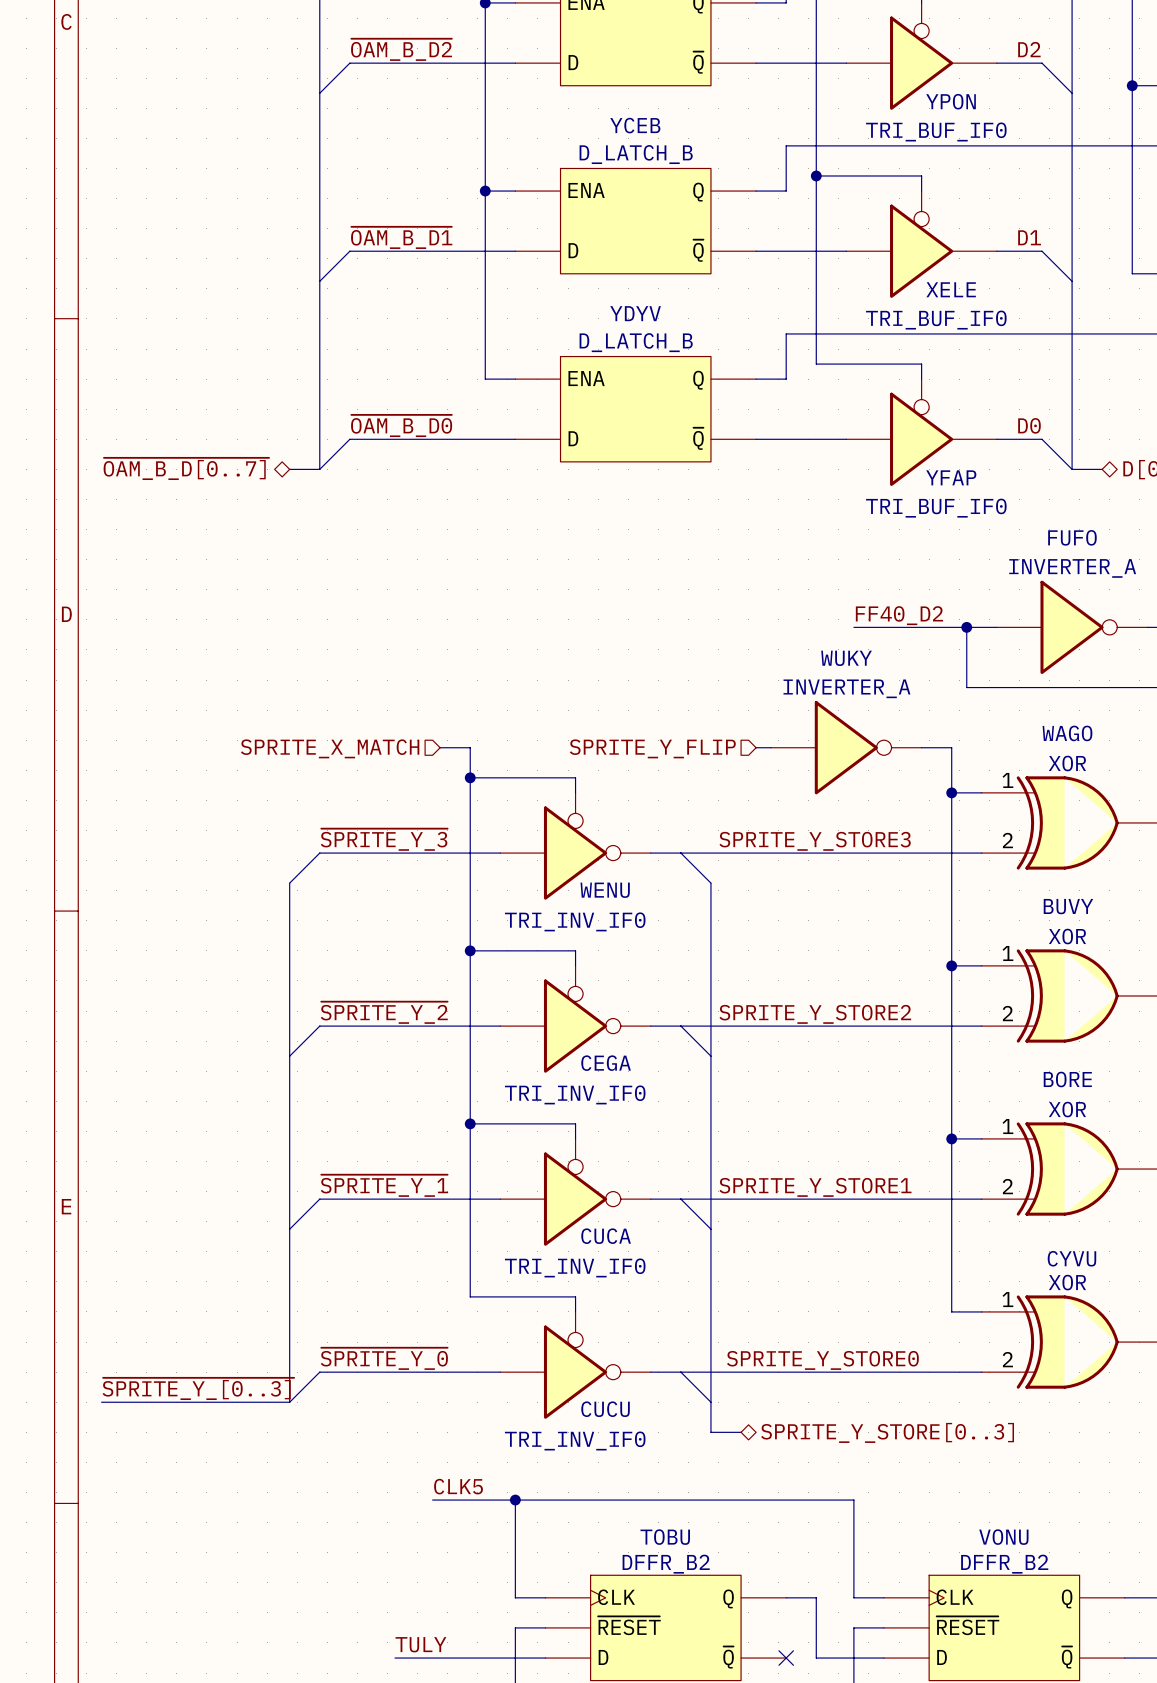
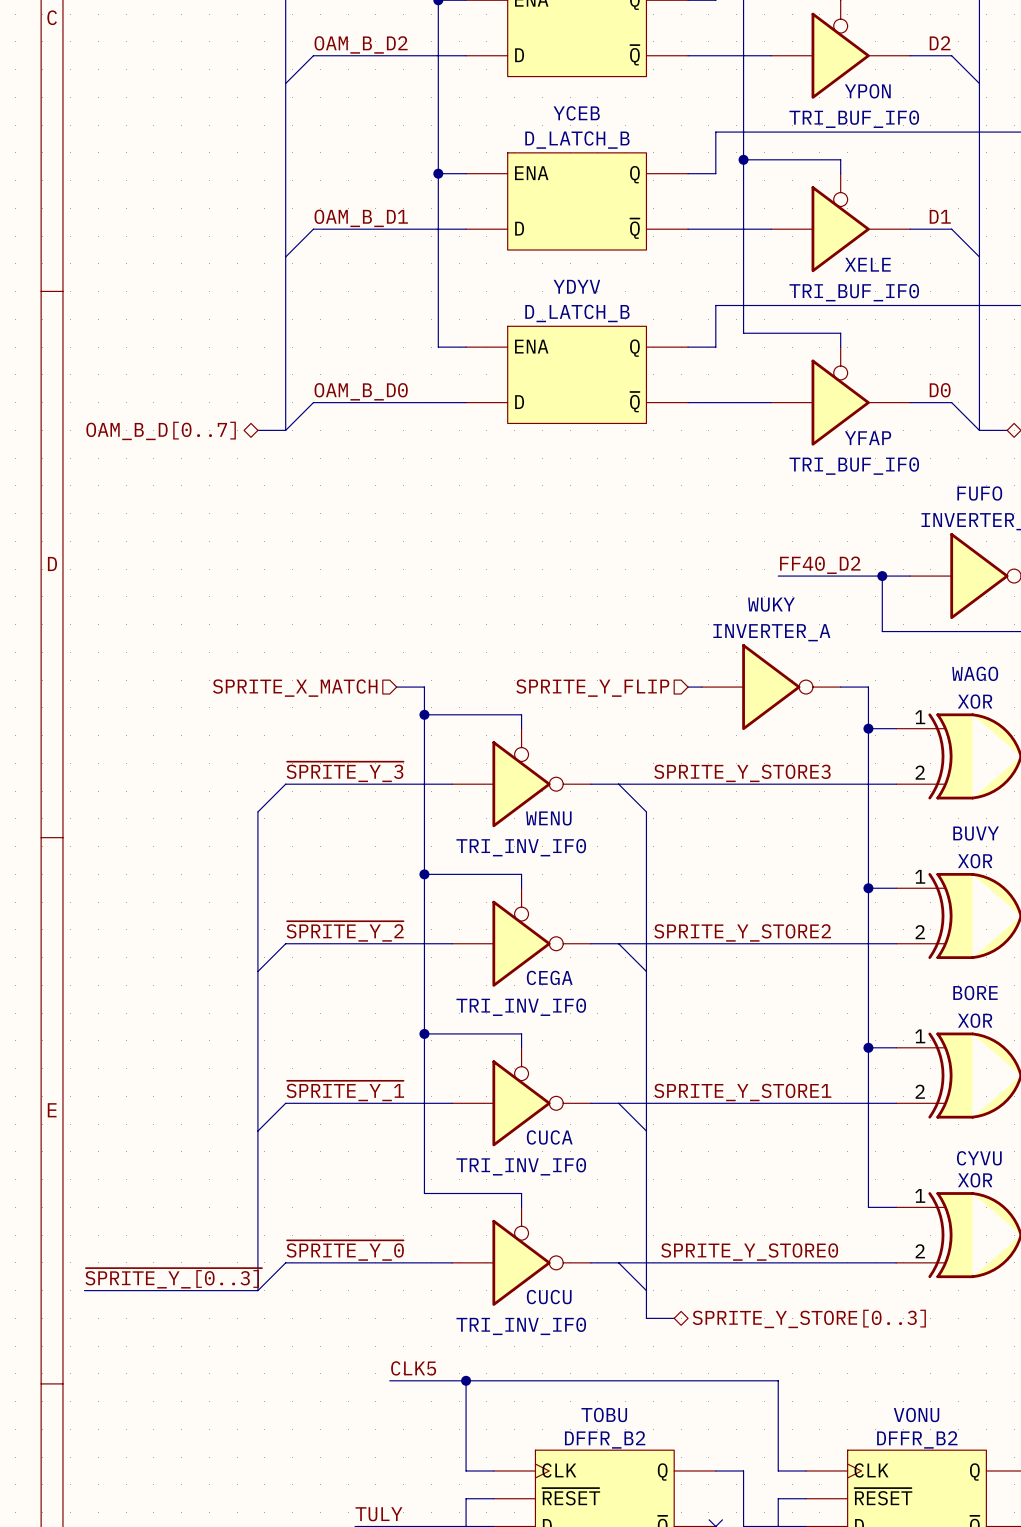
label: ~{OAM_B_D2} (401, 49) -> OAM_B_D2 (361, 44)
label: ~{OAM_B_D1} (401, 237) -> OAM_B_D1 (361, 218)
label: ~{OAM_B_D0} (401, 425) -> OAM_B_D0 (361, 391)
hierarchical label: ~{OAM_B_D[0..7]} (186, 468) -> OAM_B_D[0..7] (161, 430)

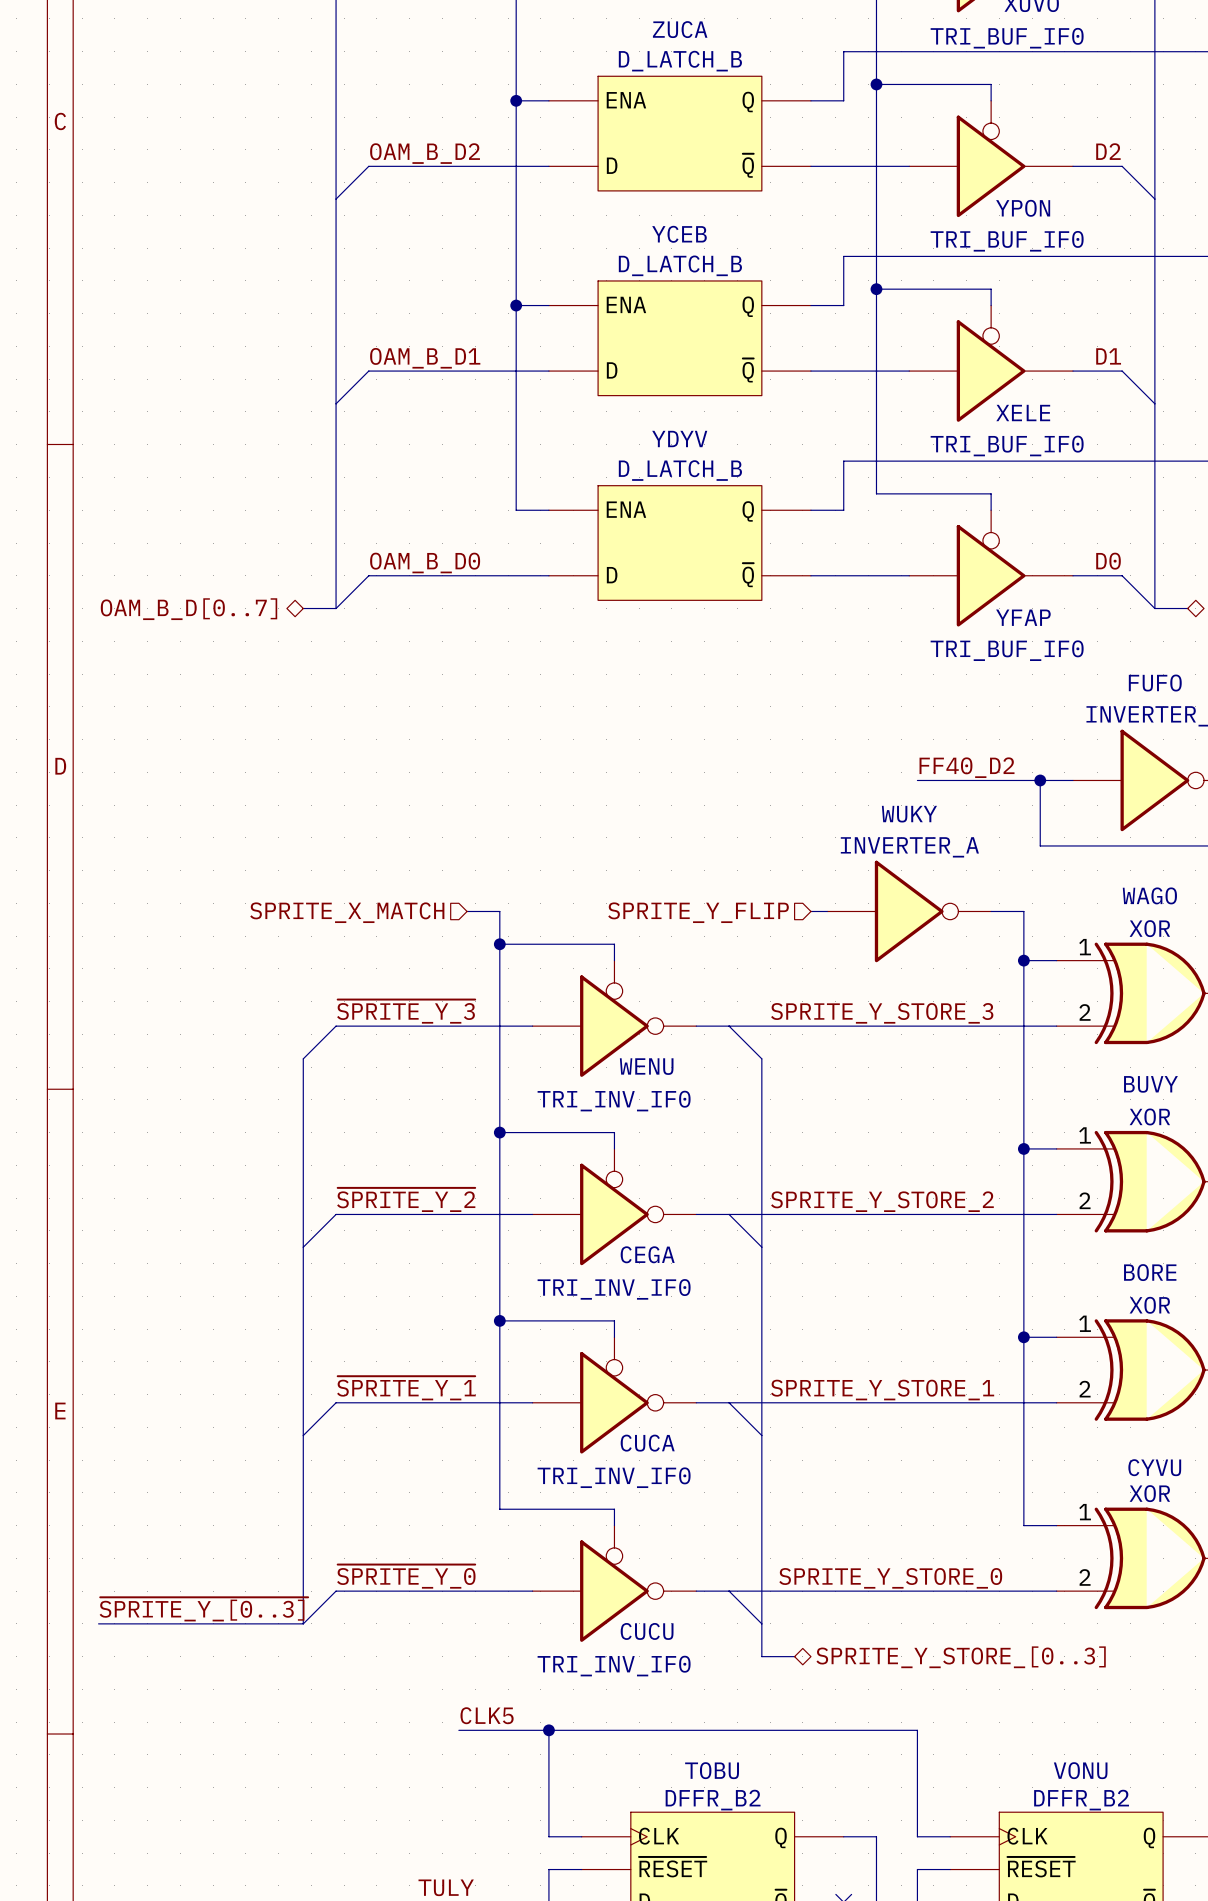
label: SPRITE_Y_STORE3 (742, 773) -> SPRITE_Y_STORE_3 (882, 1013)
label: SPRITE_Y_STORE2 (742, 932) -> SPRITE_Y_STORE_2 (882, 1201)
label: SPRITE_Y_STORE1 (742, 1092) -> SPRITE_Y_STORE_1 (882, 1390)
label: SPRITE_Y_STORE0 (749, 1252) -> SPRITE_Y_STORE_0 (890, 1578)
hierarchical label: SPRITE_Y_STORE[0..3] (809, 1318) -> SPRITE_Y_STORE_[0..3] (961, 1657)

